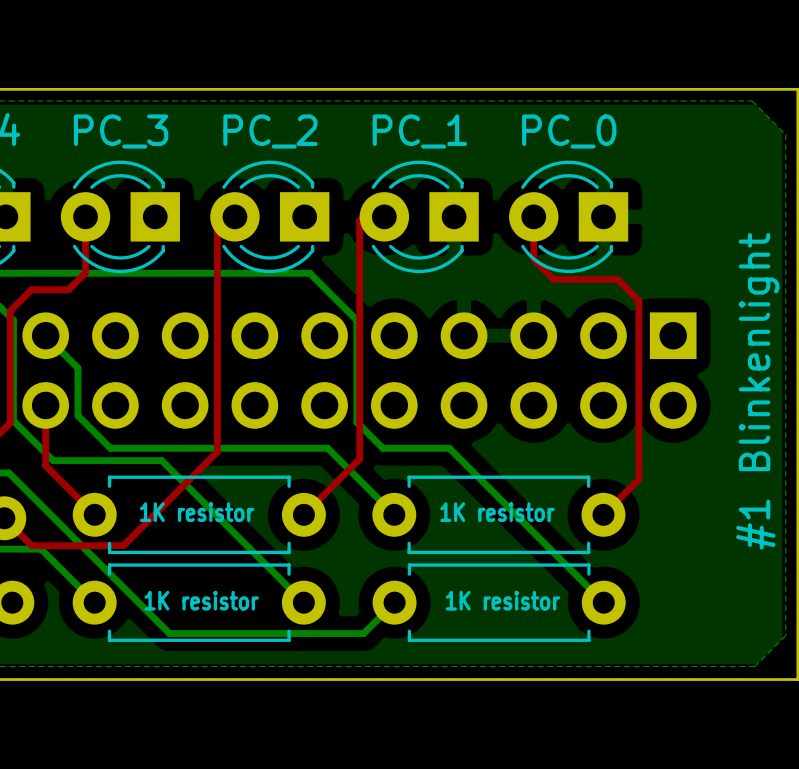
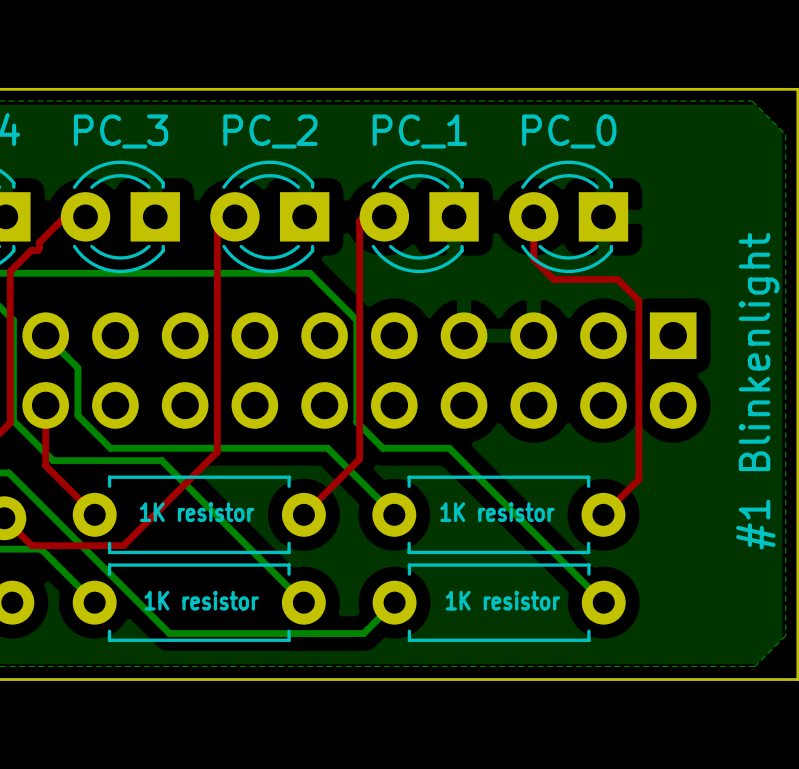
top track: (85, 196) (85, 272) (68, 289) (31, 289) (10, 311) -> (85, 196) (39, 242) (37, 250) (31, 250) (10, 271) (10, 311)

